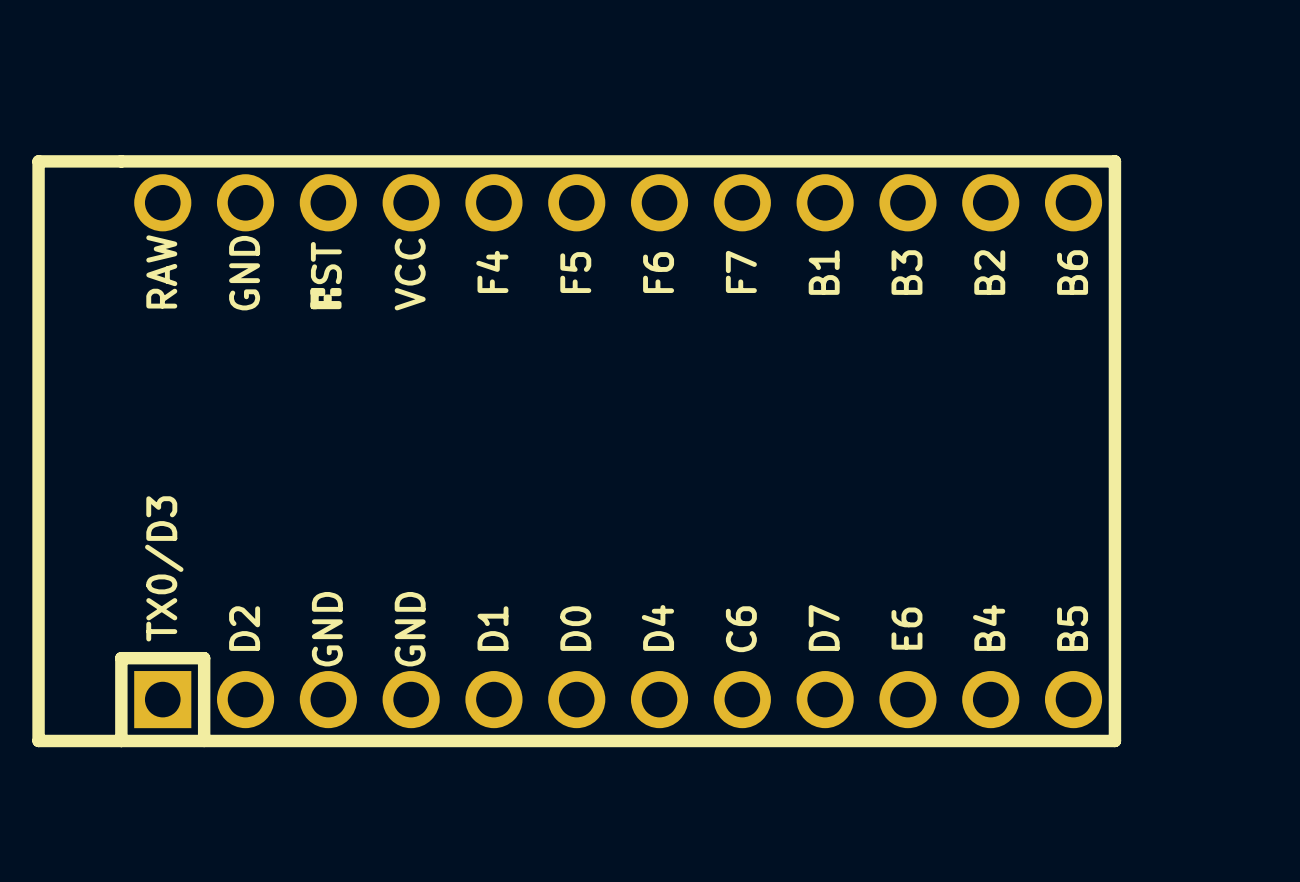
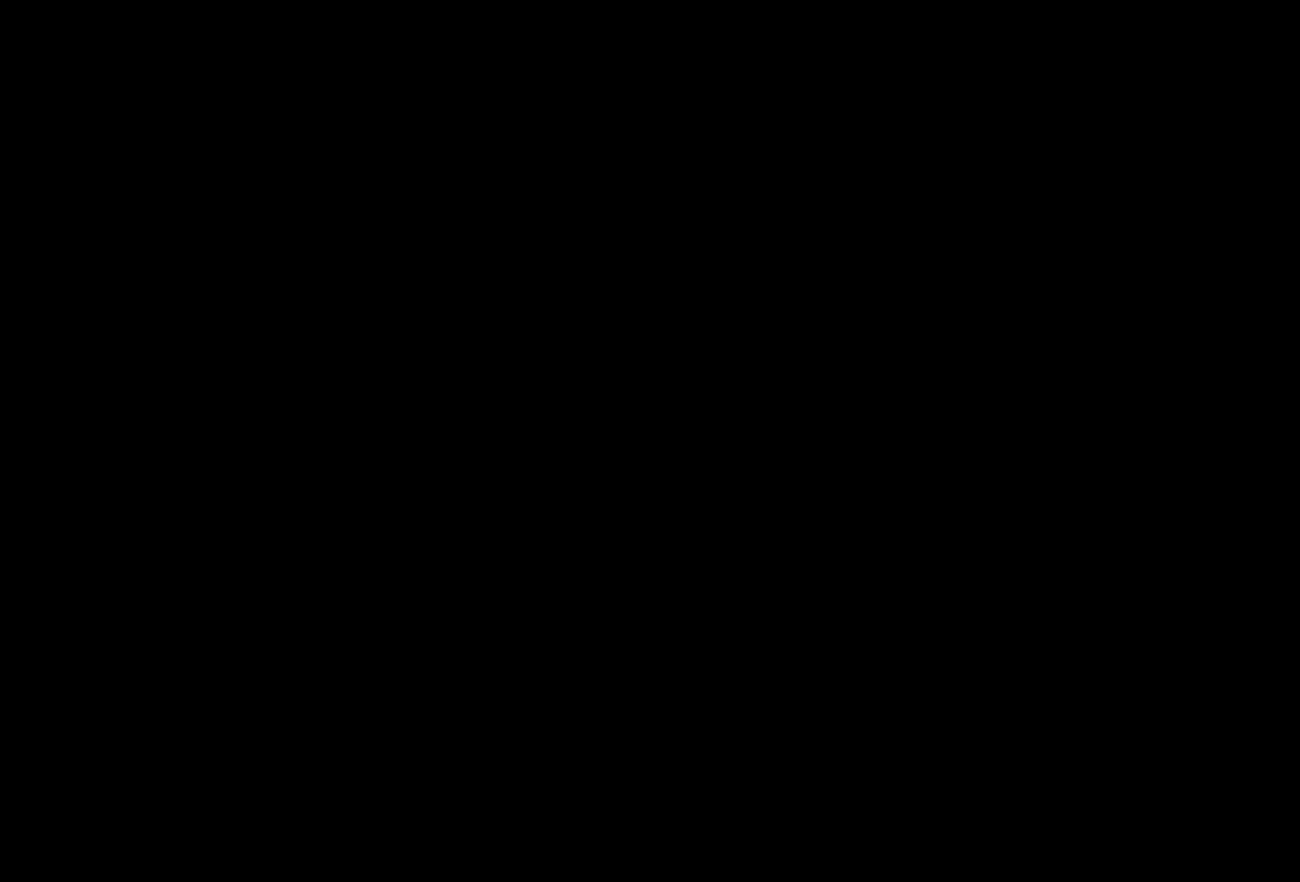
part: (576, 451) -> none

